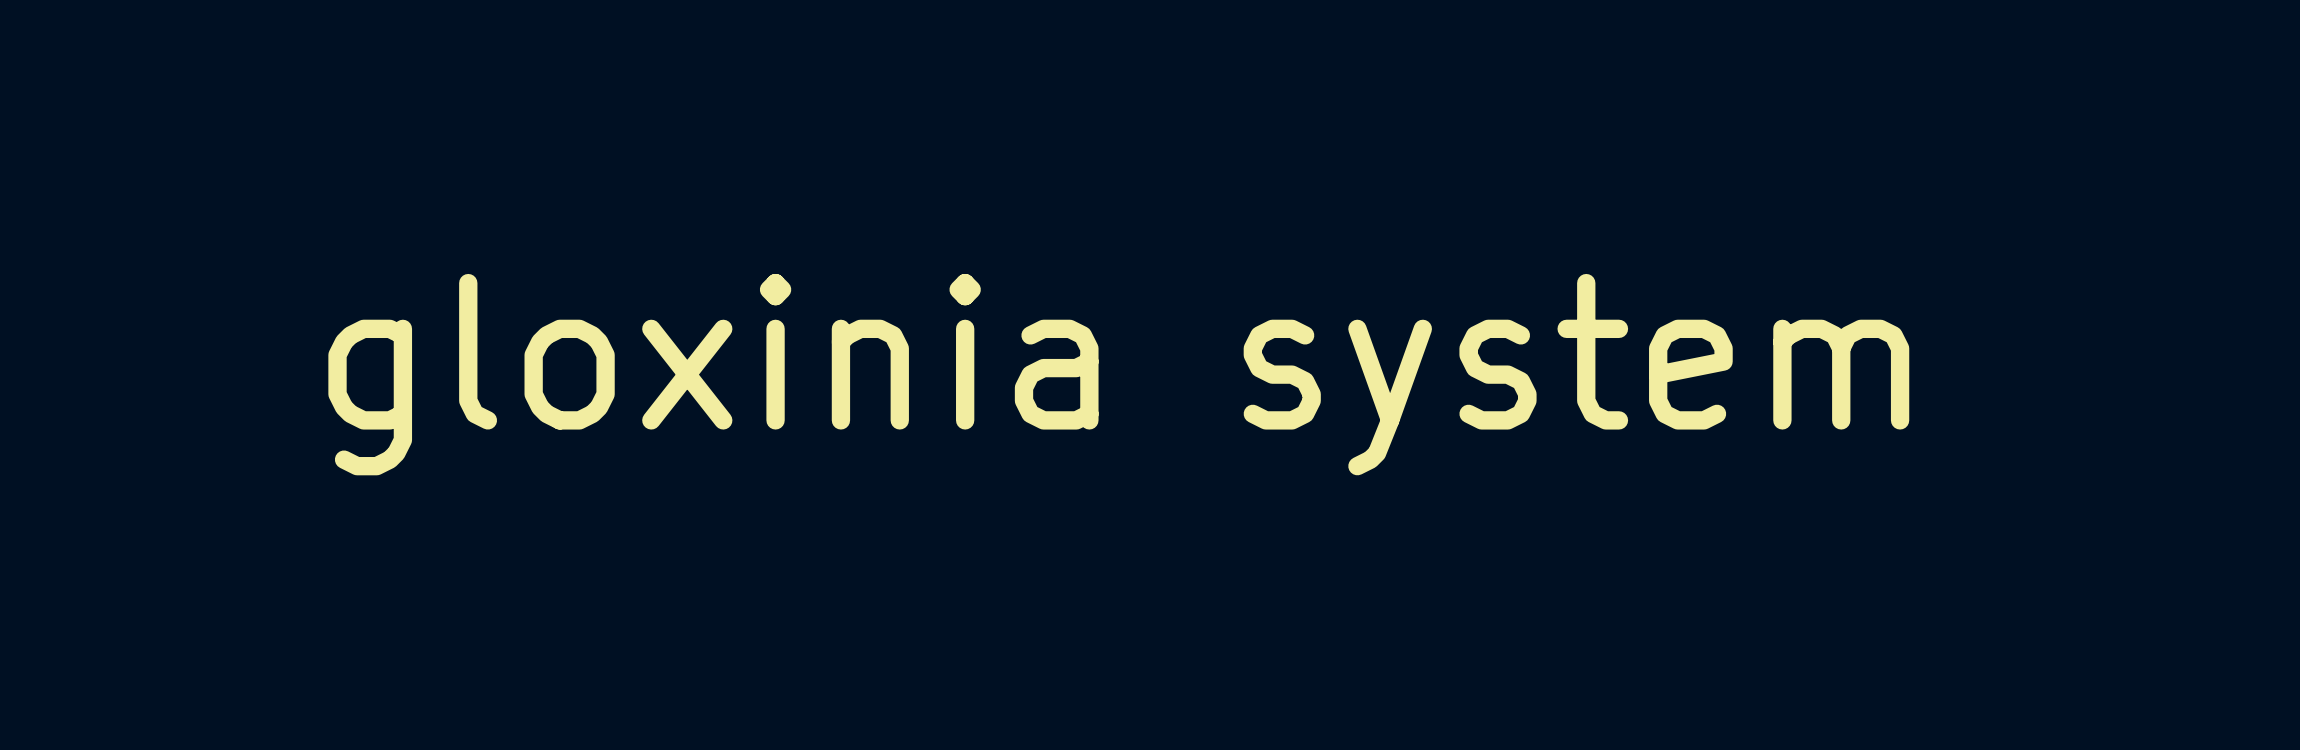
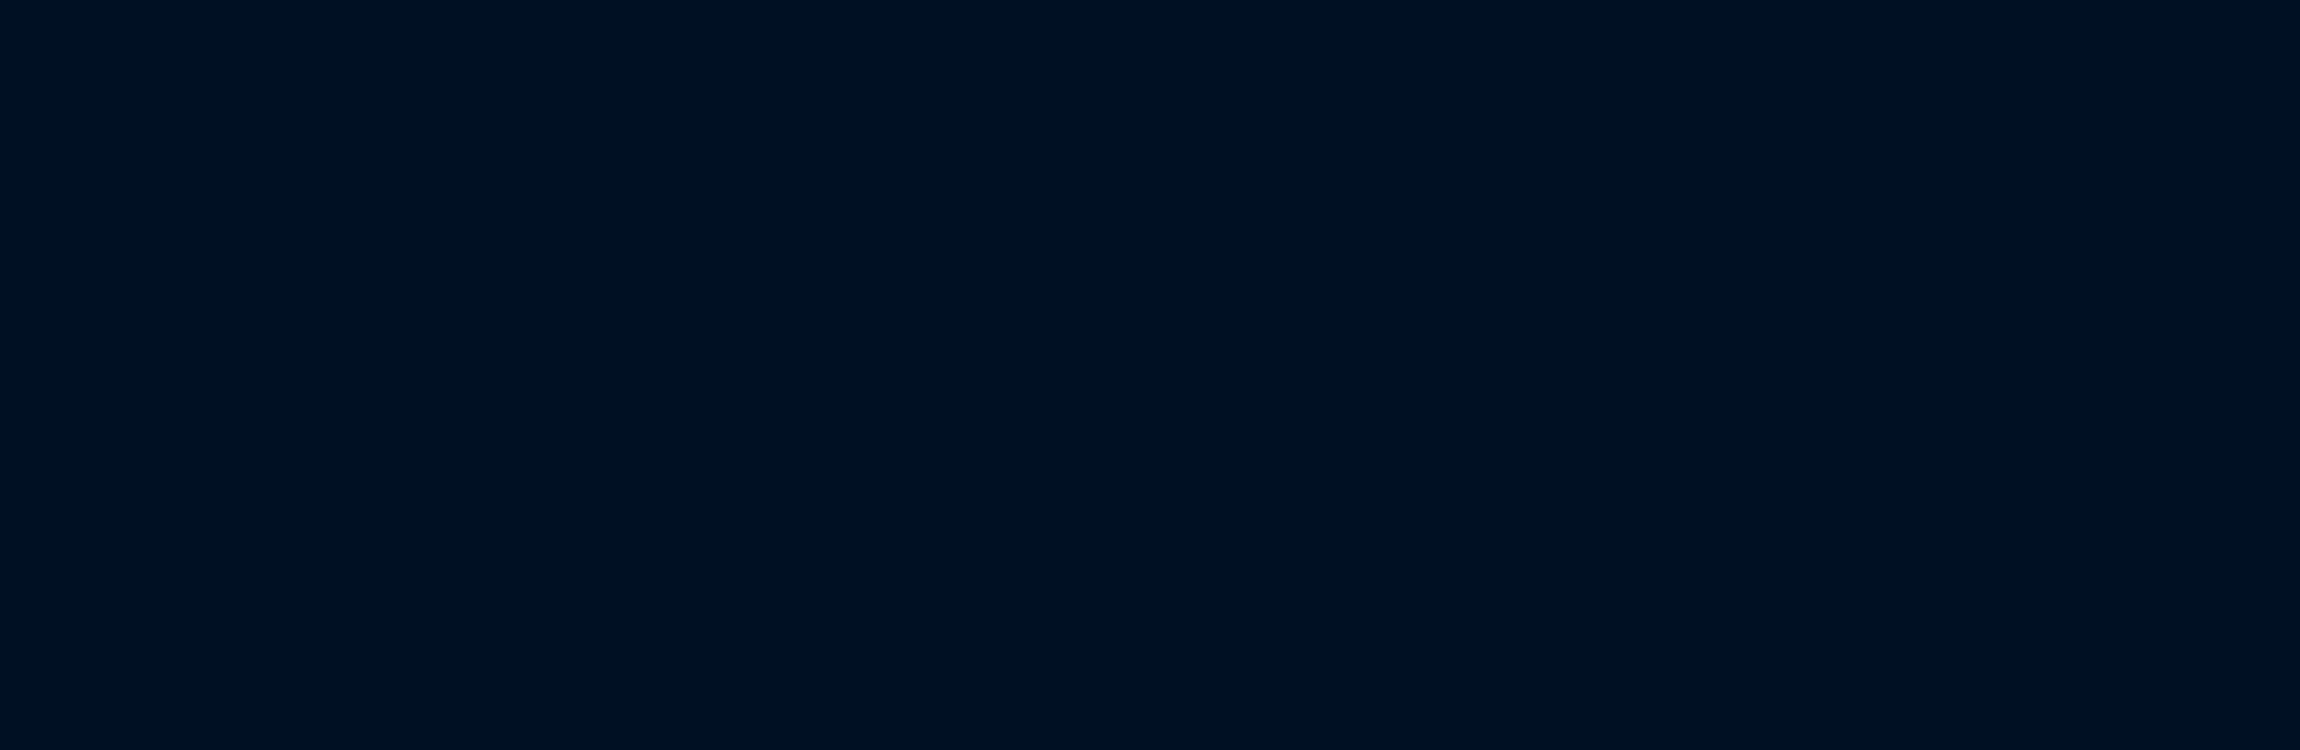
text: gloxinia system (1118, 374) -> none

